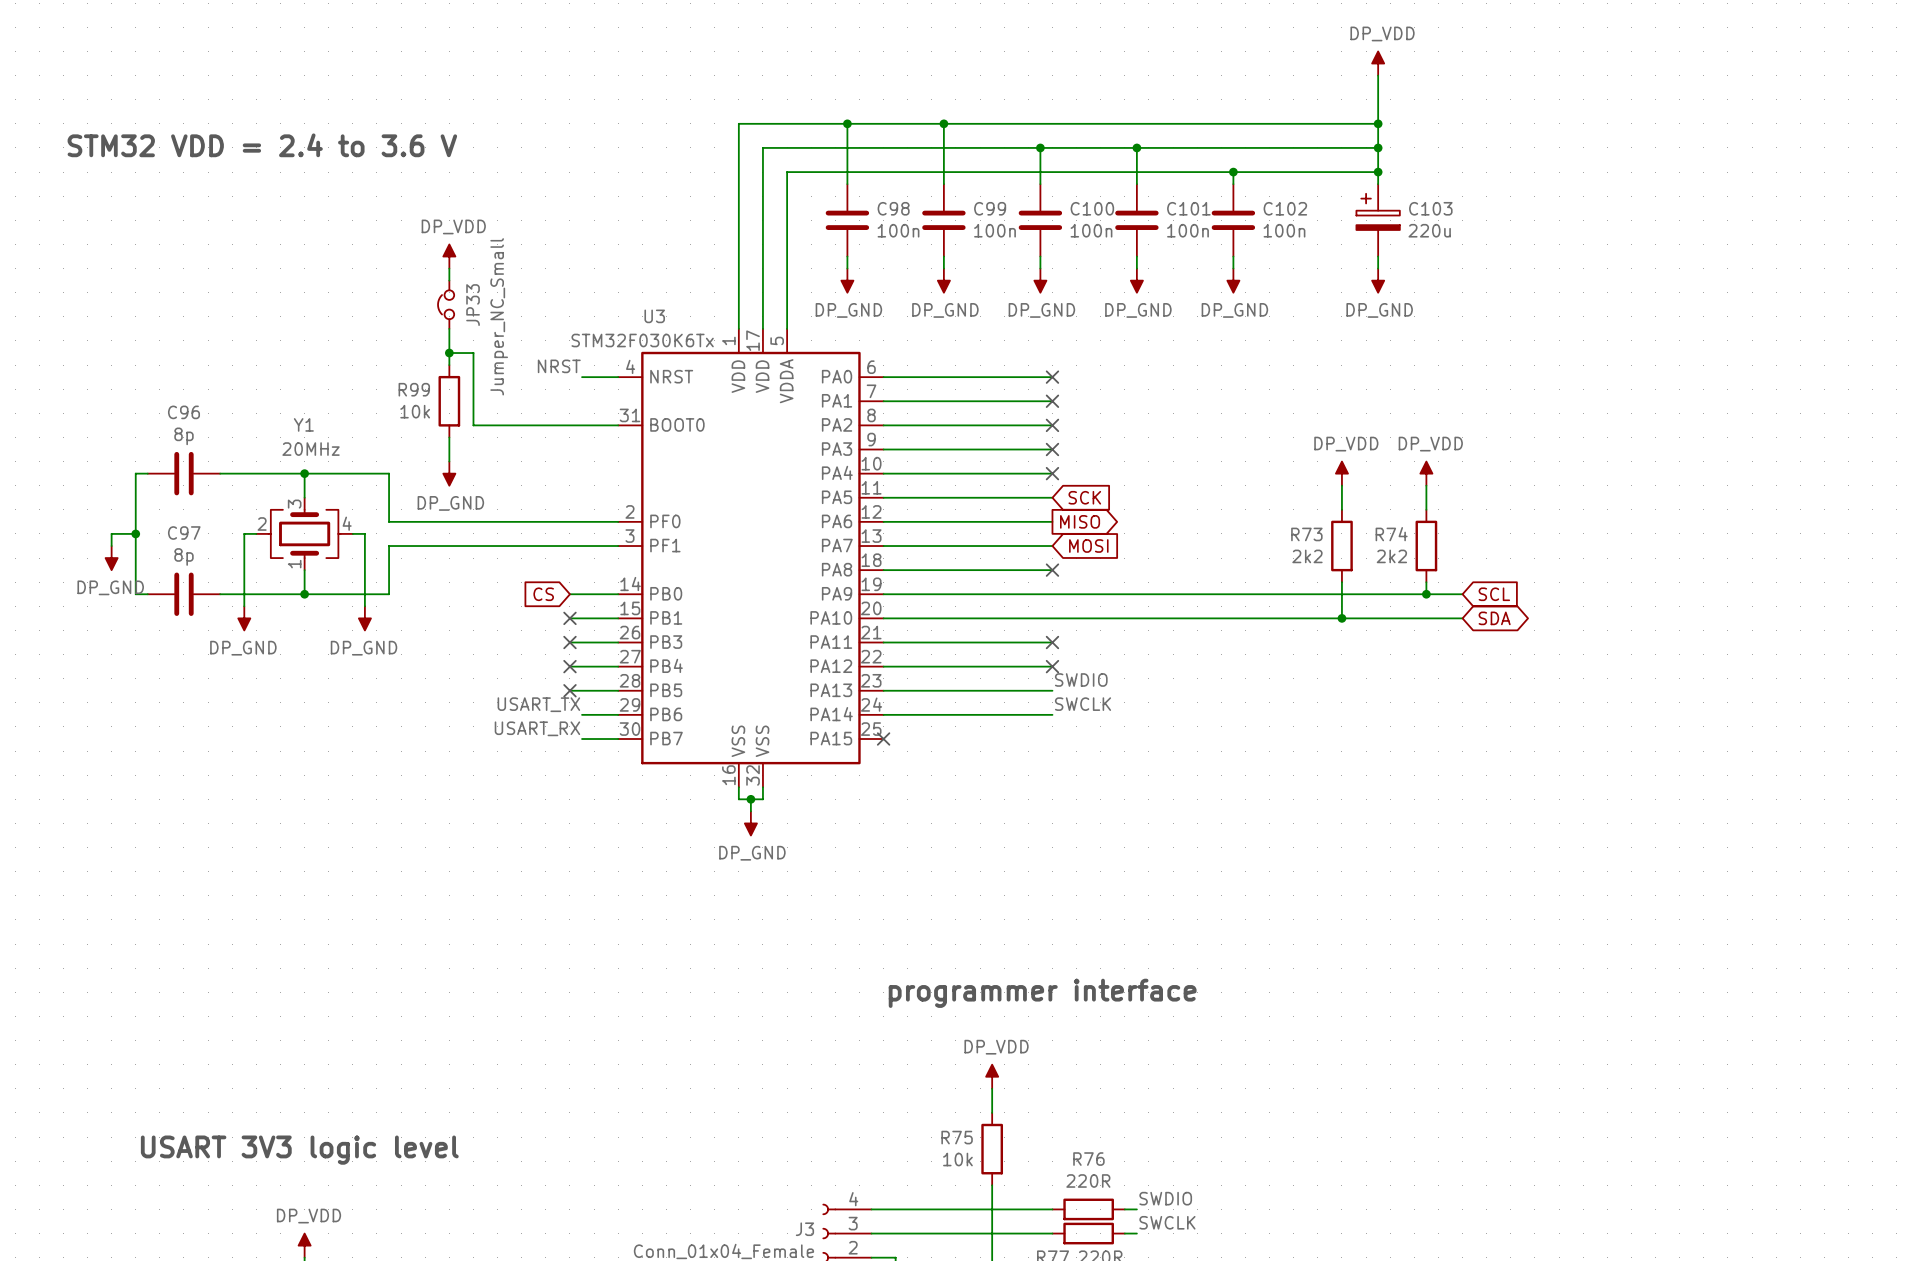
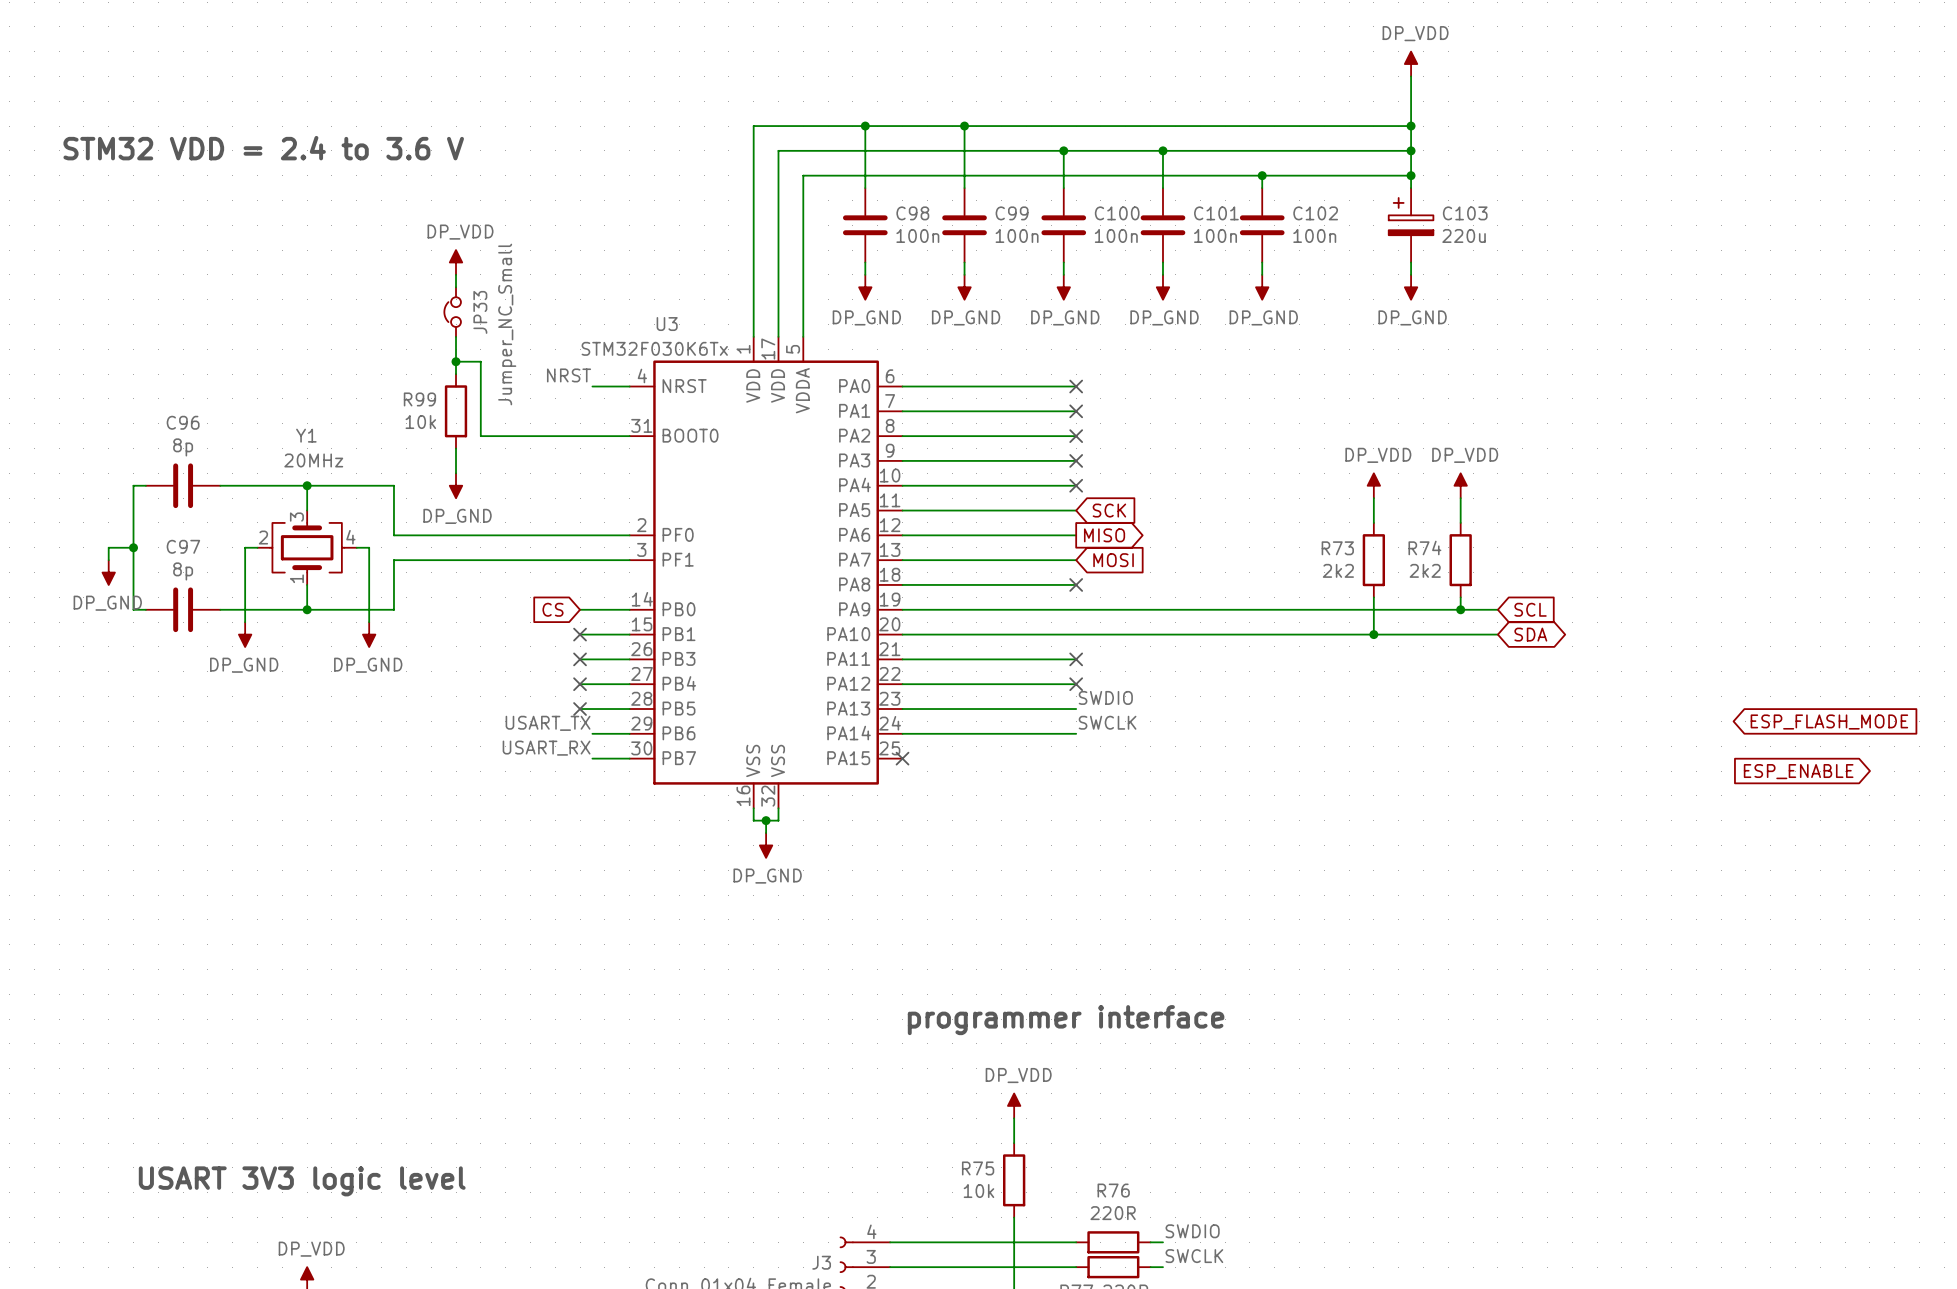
global label: none -> ESP_FLASH_MODE (1829, 722)
global label: none -> ESP_ENABLE (1798, 771)

